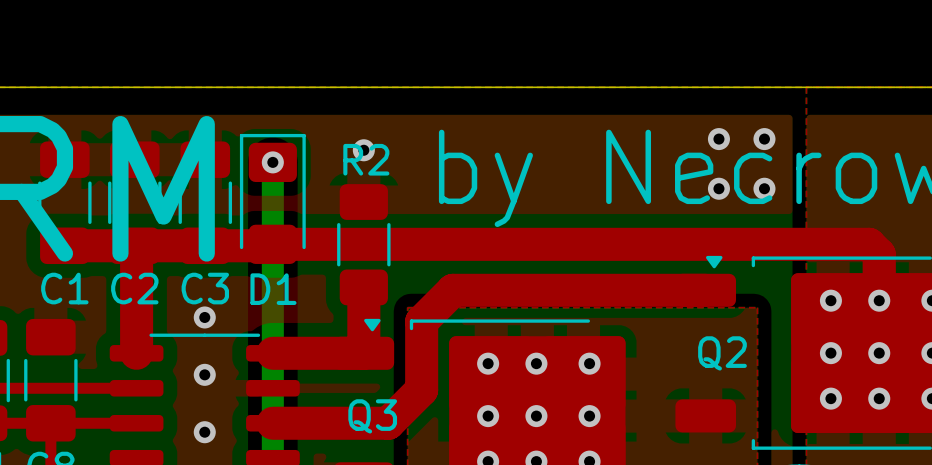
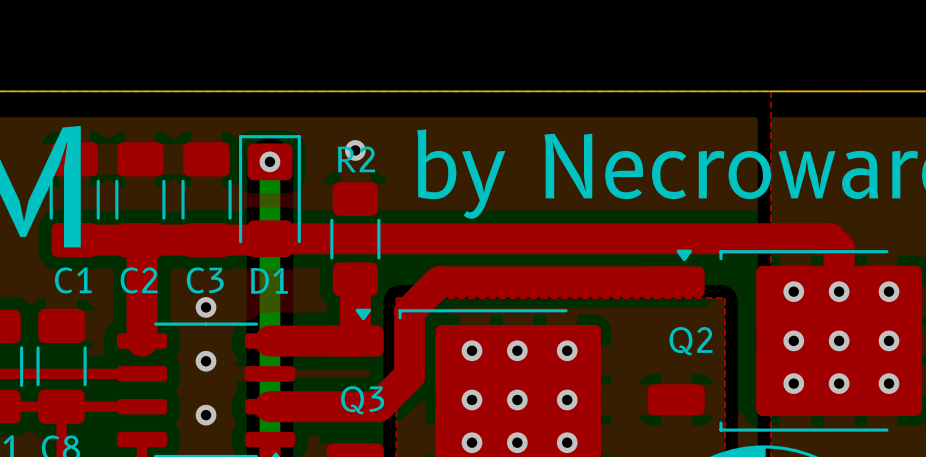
via: (718, 139) -> none
via: (764, 139) -> none
via: (718, 188) -> none
via: (764, 188) -> none

